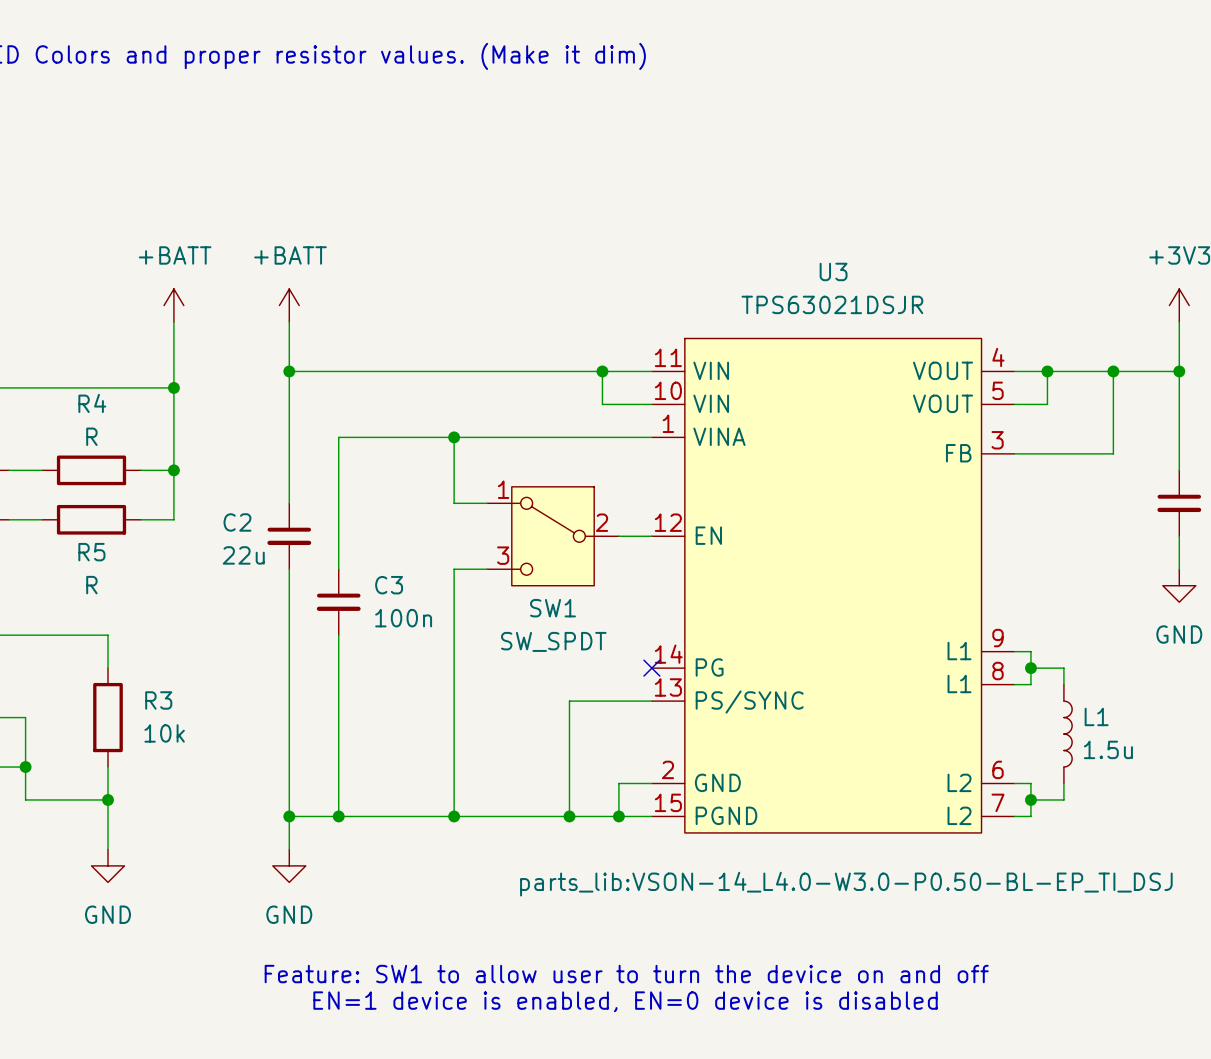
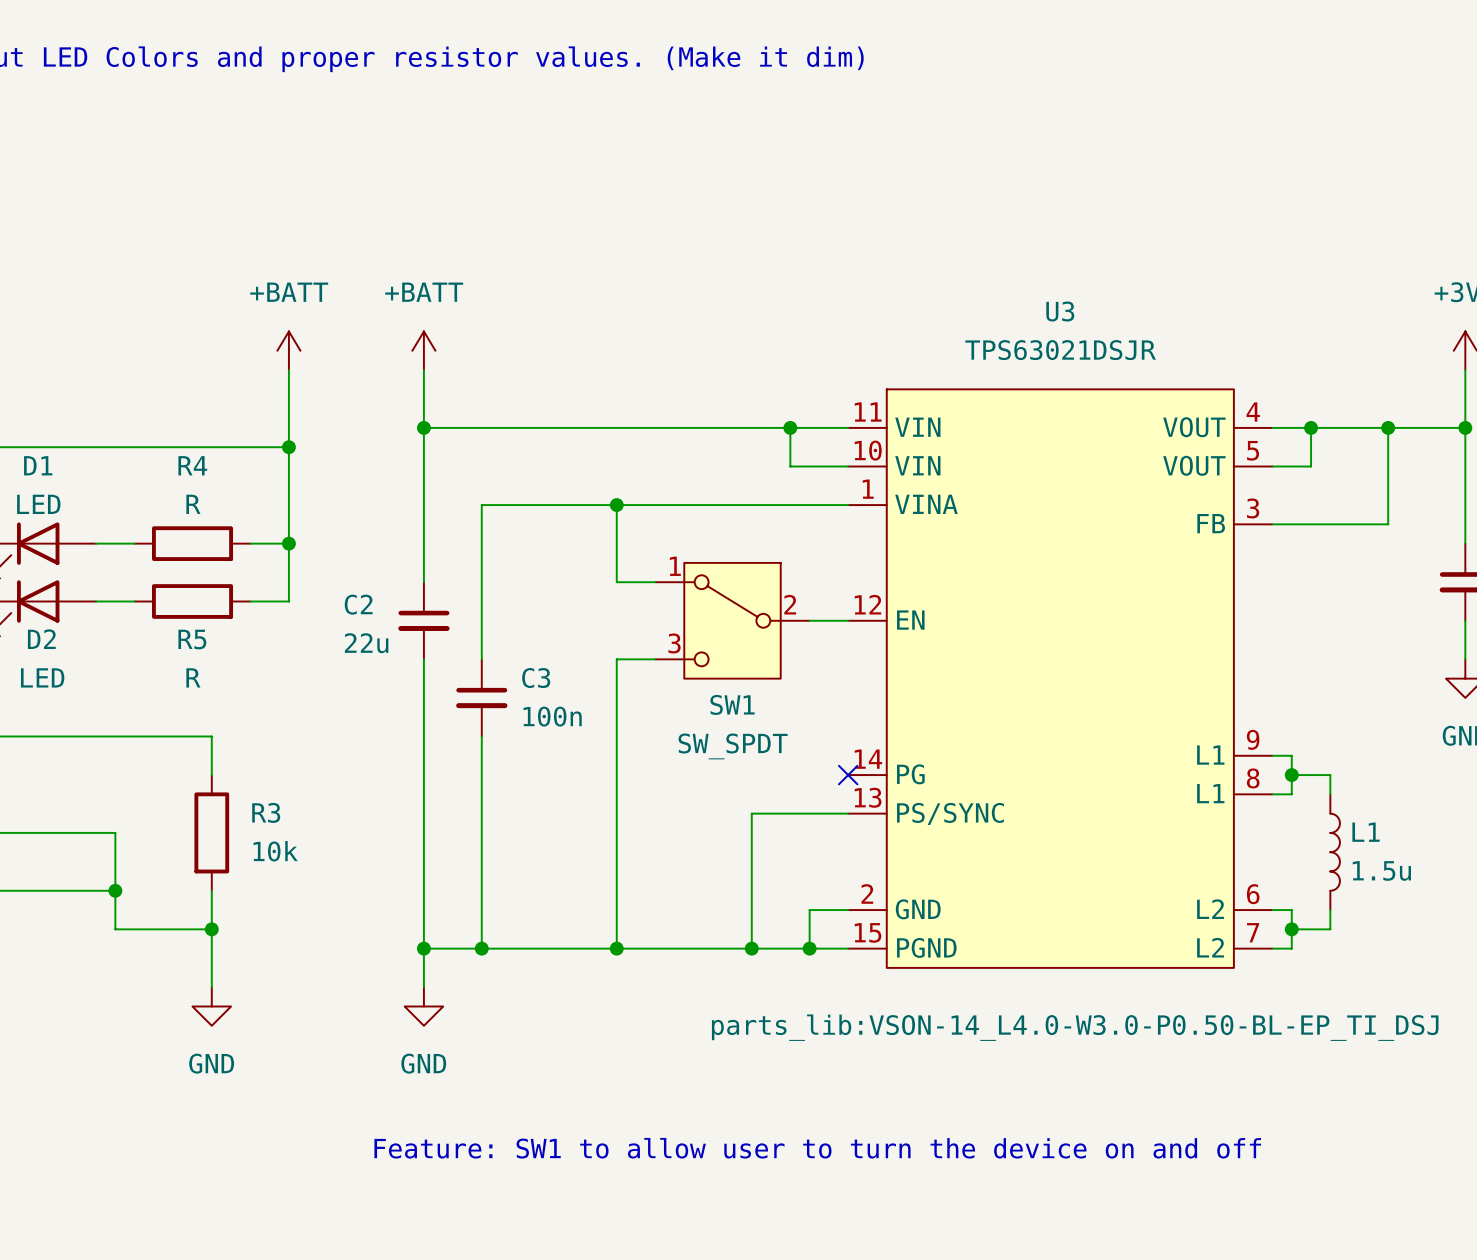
text position: Feature: SW1 to allow user to turn the device on and off (626, 974) -> Feature: SW1 to allow user to turn the device on and off (817, 1148)
text: EN=1 device is enabled, EN=0 device is disabled (625, 1001) -> none

